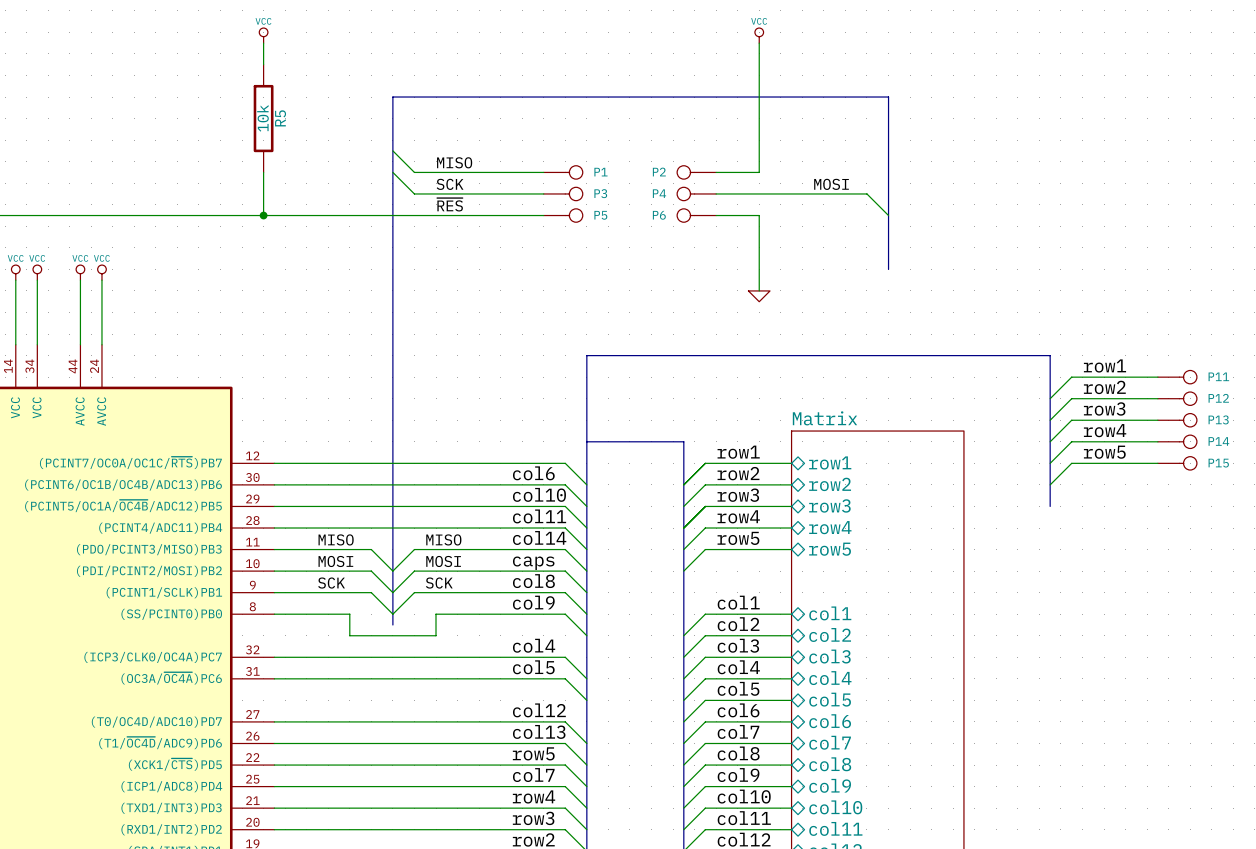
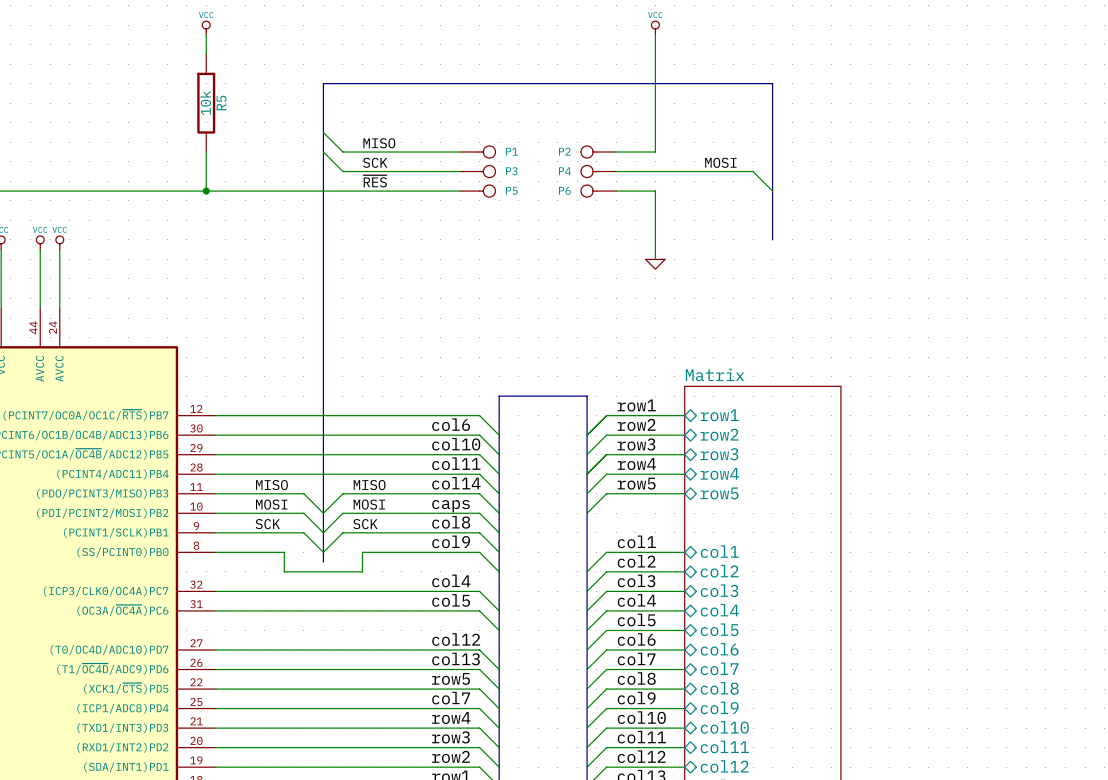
label: row1 (1104, 365) -> none
wire: (1157, 377) (1071, 377) (1050, 398) -> none
P11: (1177, 377) -> none
label: row2 (1104, 387) -> none
wire: (1157, 398) (1071, 398) (1050, 420) -> none
P12: (1177, 398) -> none
label: row3 (1104, 408) -> none
wire: (1157, 420) (1071, 420) (1050, 441) -> none
P13: (1177, 420) -> none
label: row4 (1105, 430) -> none
bus: (586, 441) (586, 355) (1050, 355) (1050, 506) -> none
wire: (1157, 441) (1071, 441) (1050, 463) -> none
P14: (1177, 441) -> none
label: row5 (1104, 452) -> none
wire: (1157, 463) (1071, 463) (1050, 484) -> none
P15: (1177, 463) -> none

